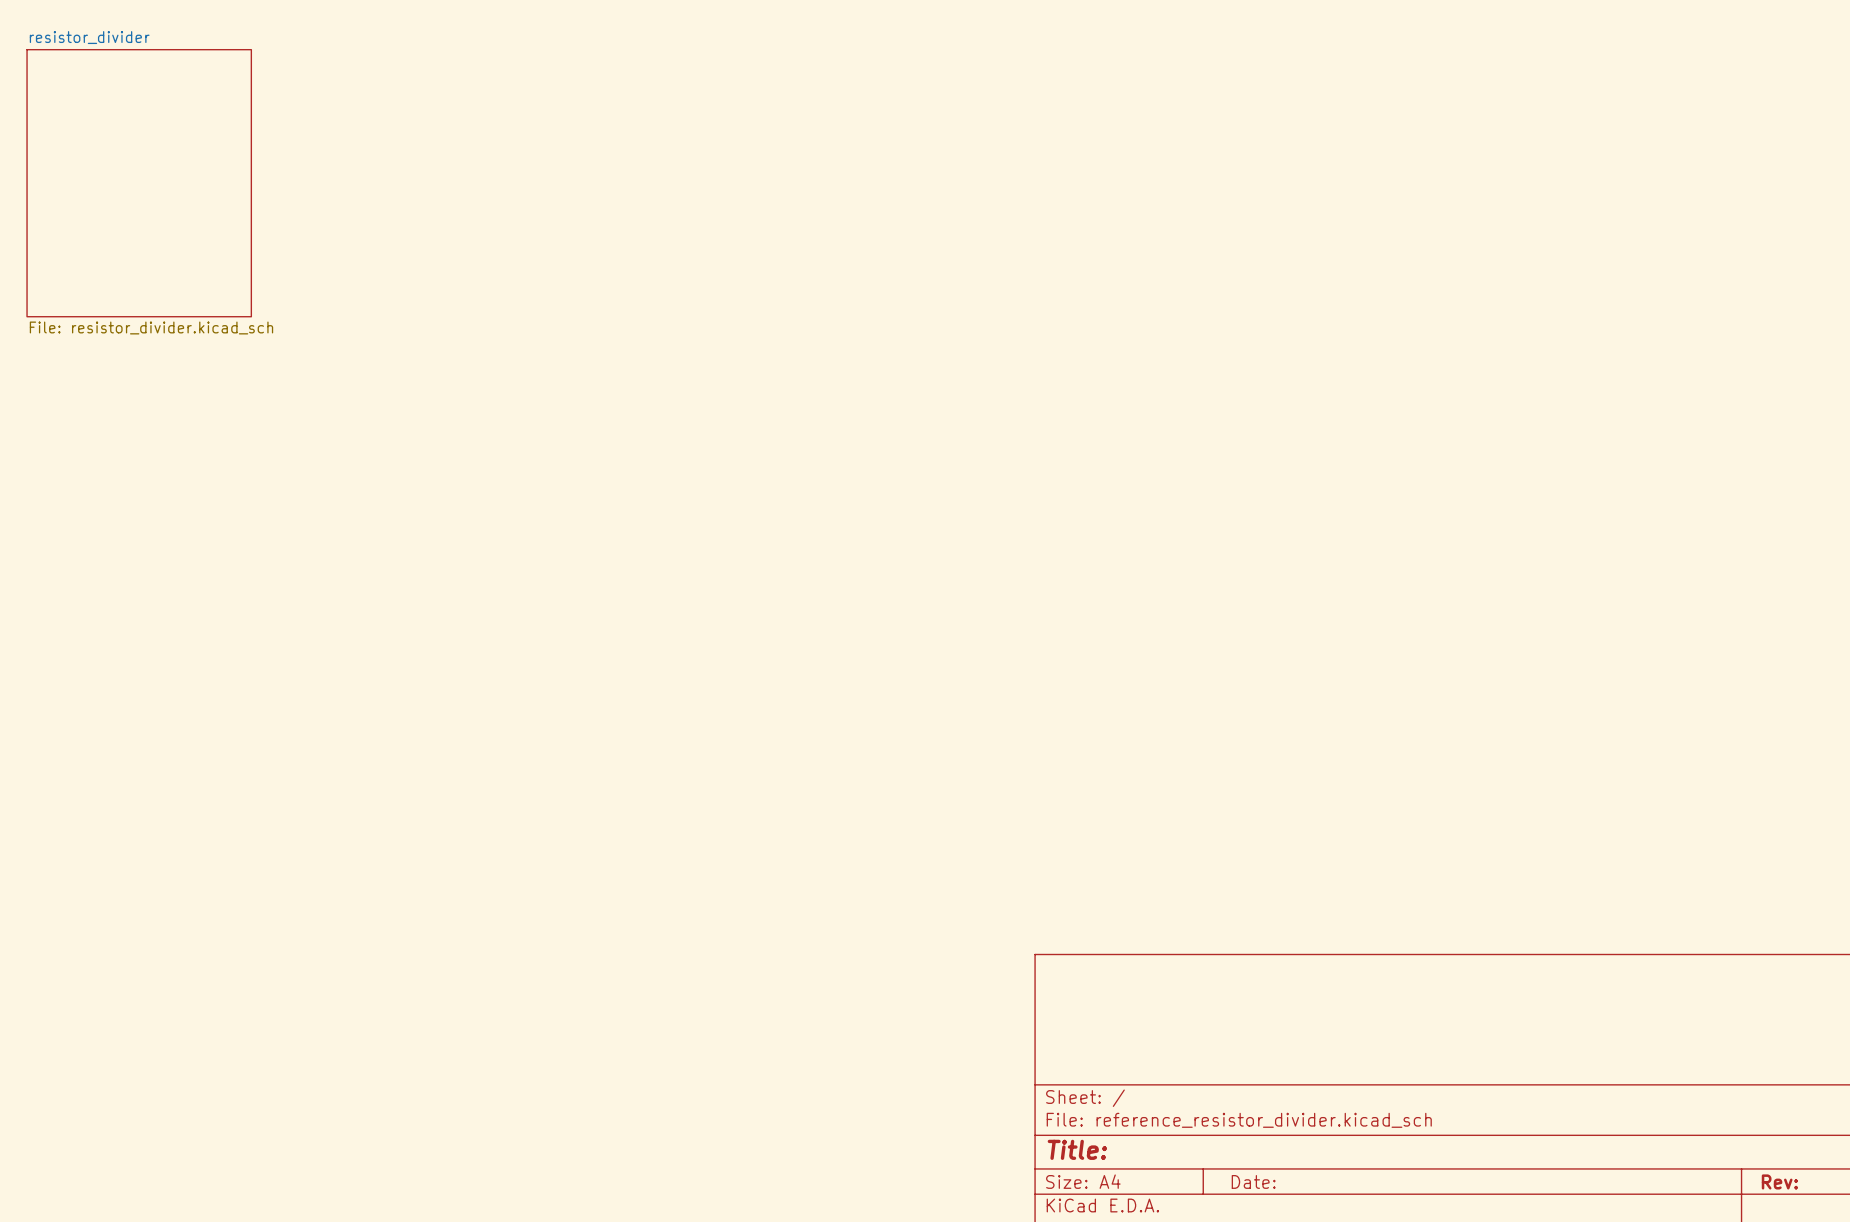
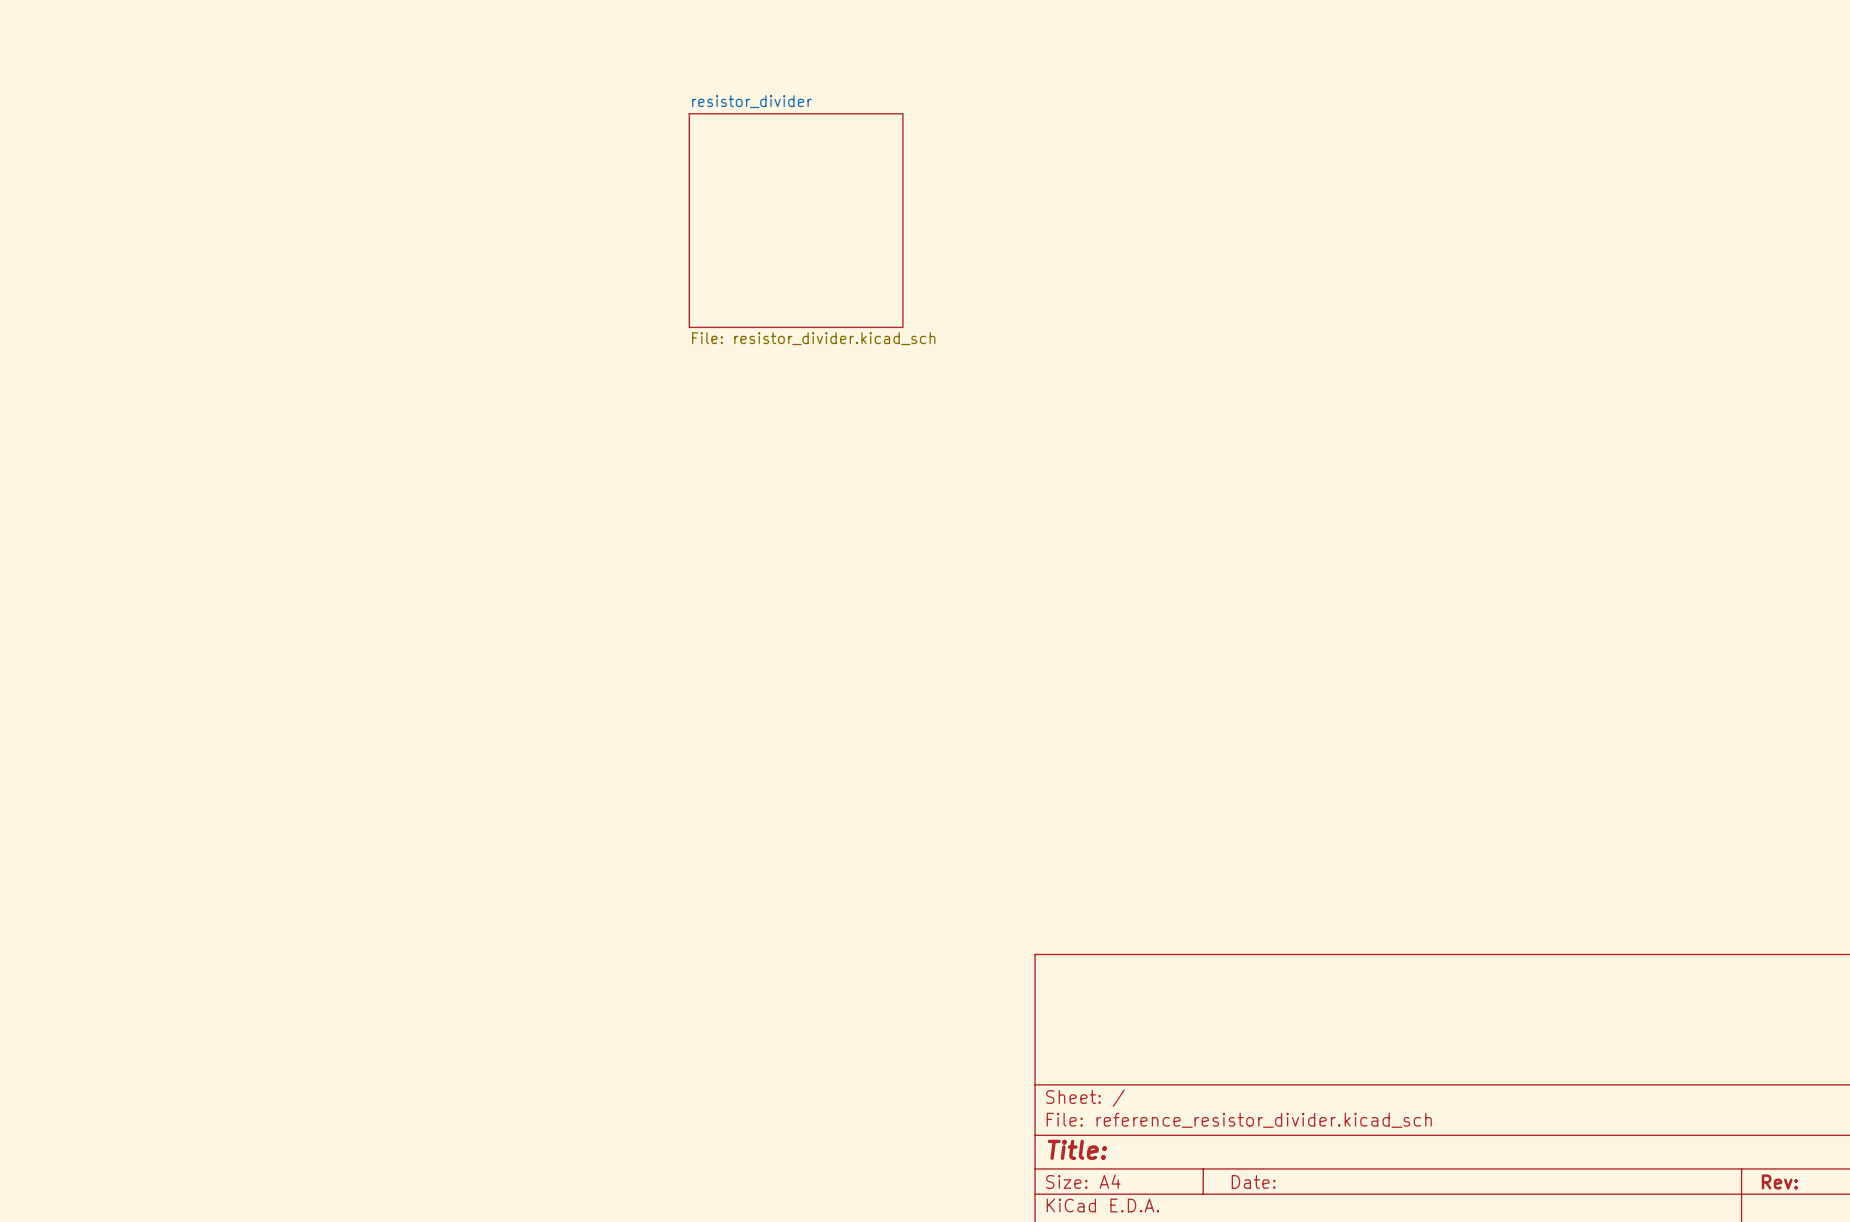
sheet resistor_divider: File: resistor_divider.kicad_sch (139, 183) -> none
sheet resistor_divider: none -> File: resistor_divider.kicad_sch (796, 220)

